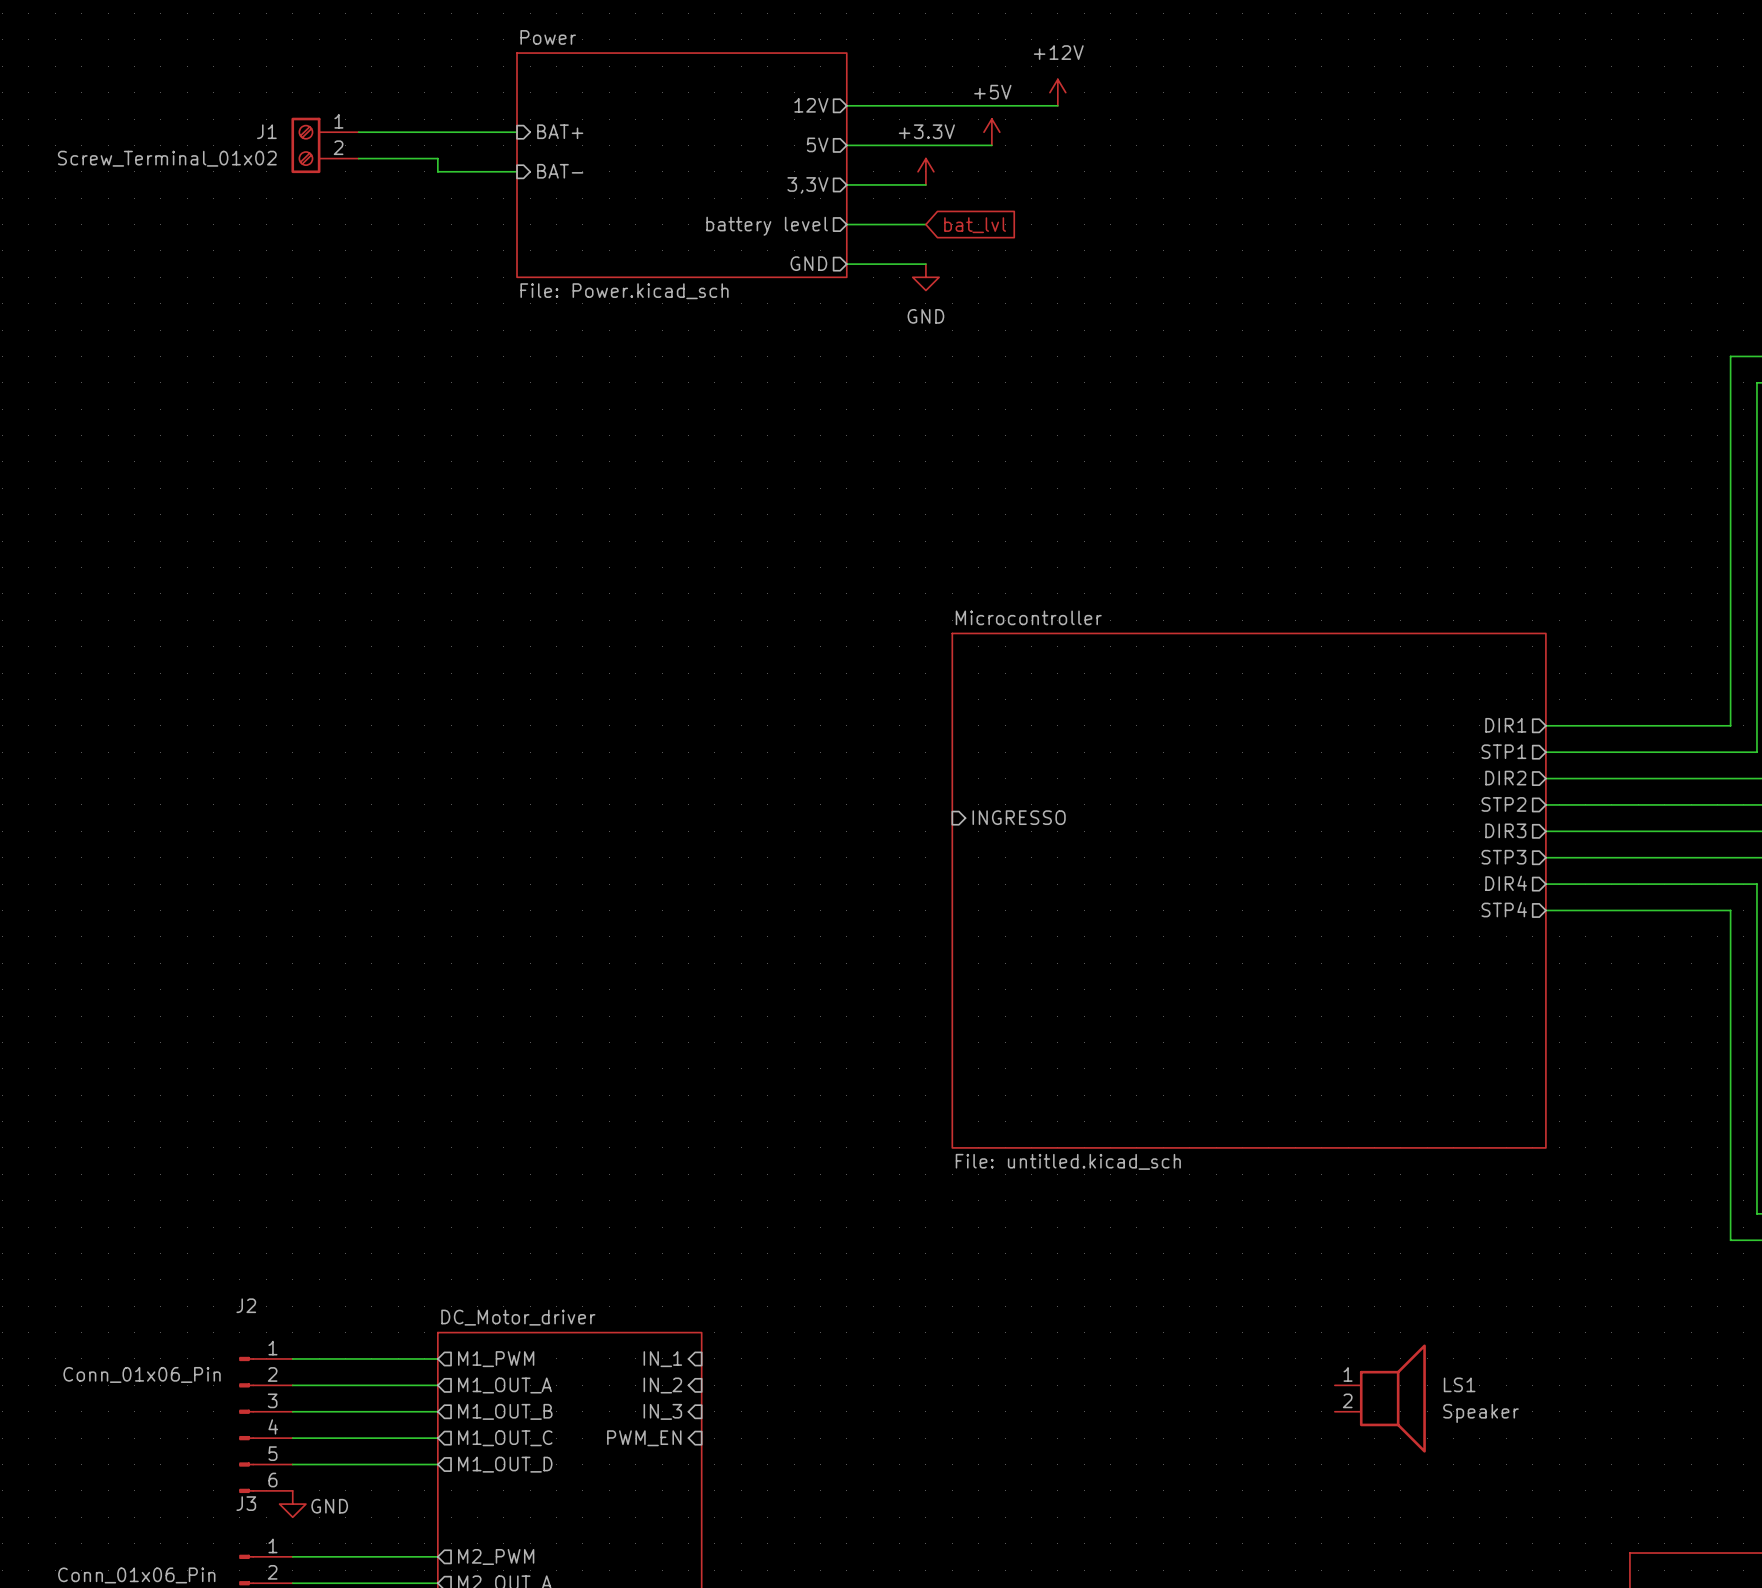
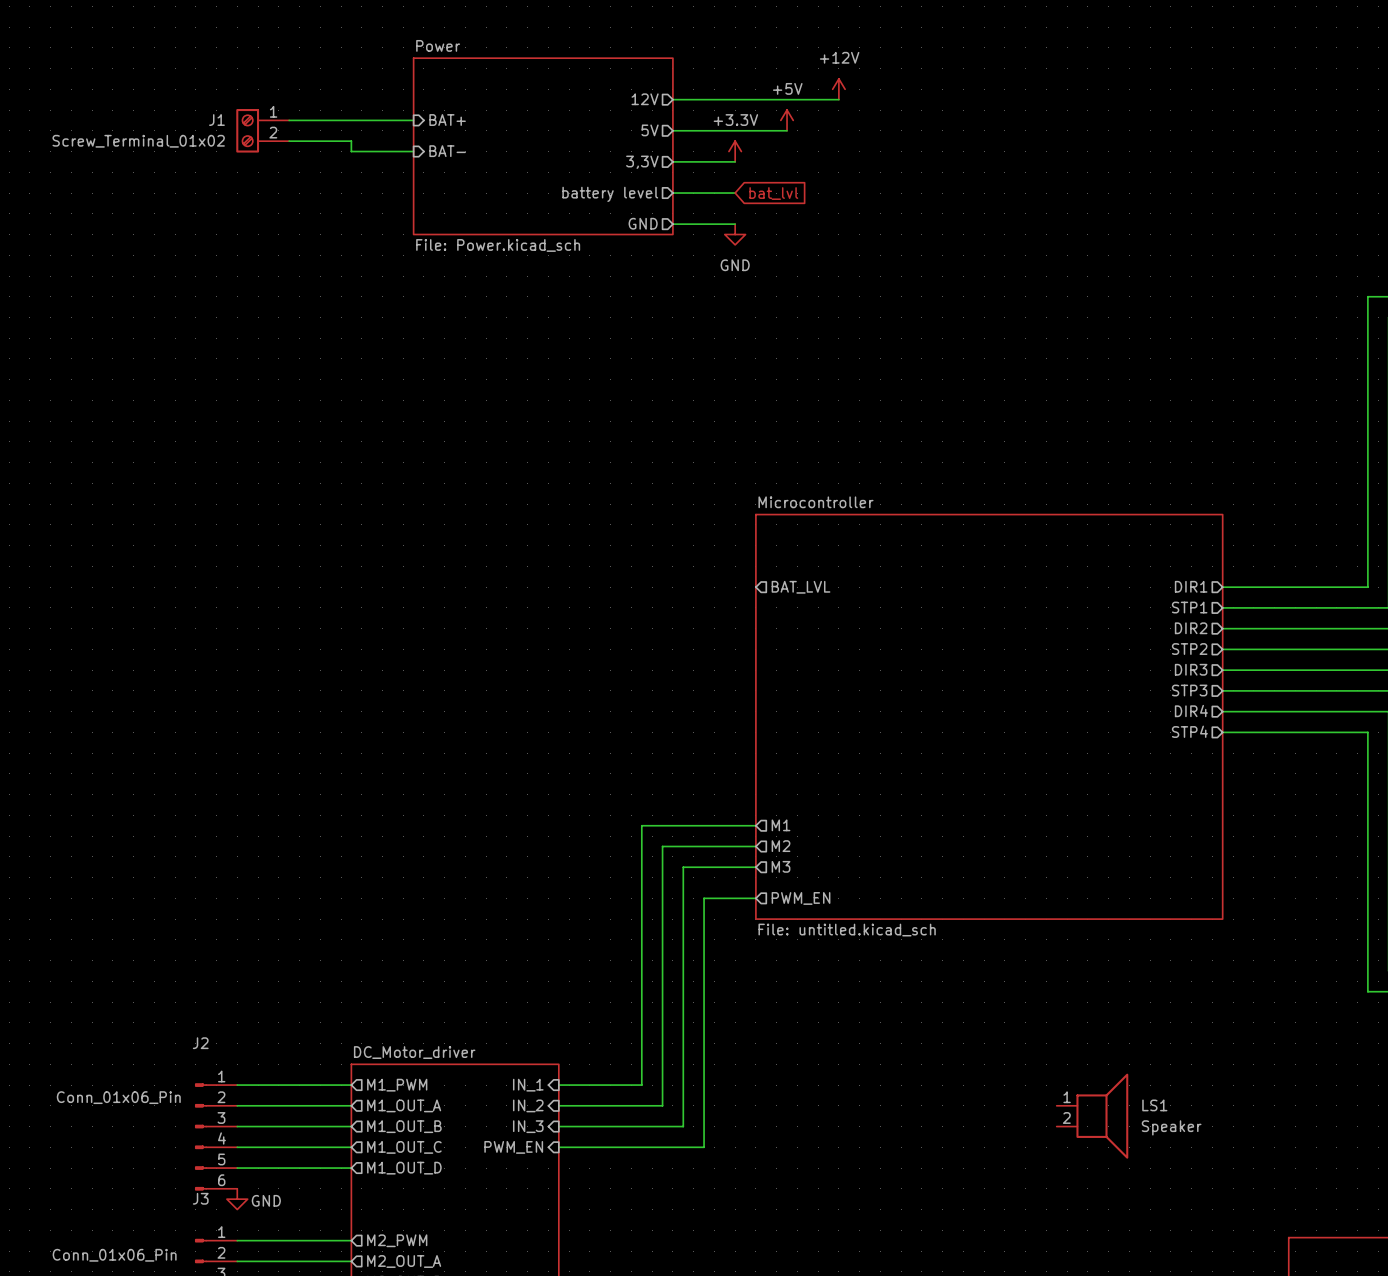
sheet pin: none -> BAT_LVL (801, 587)
sheet pin: INGRESSO (1019, 817) -> none
sheet pin: none -> M1 (781, 825)
wire: none -> (755, 825) (641, 825) (641, 1085) (558, 1085)
wire: none -> (755, 846) (662, 846) (662, 1105) (558, 1105)
sheet pin: none -> M2 (781, 846)
wire: none -> (755, 867) (683, 867) (683, 1126) (558, 1126)
sheet pin: none -> M3 (781, 866)
wire: none -> (755, 898) (704, 898) (704, 1147) (558, 1147)
sheet pin: none -> PWM_EN (801, 898)

